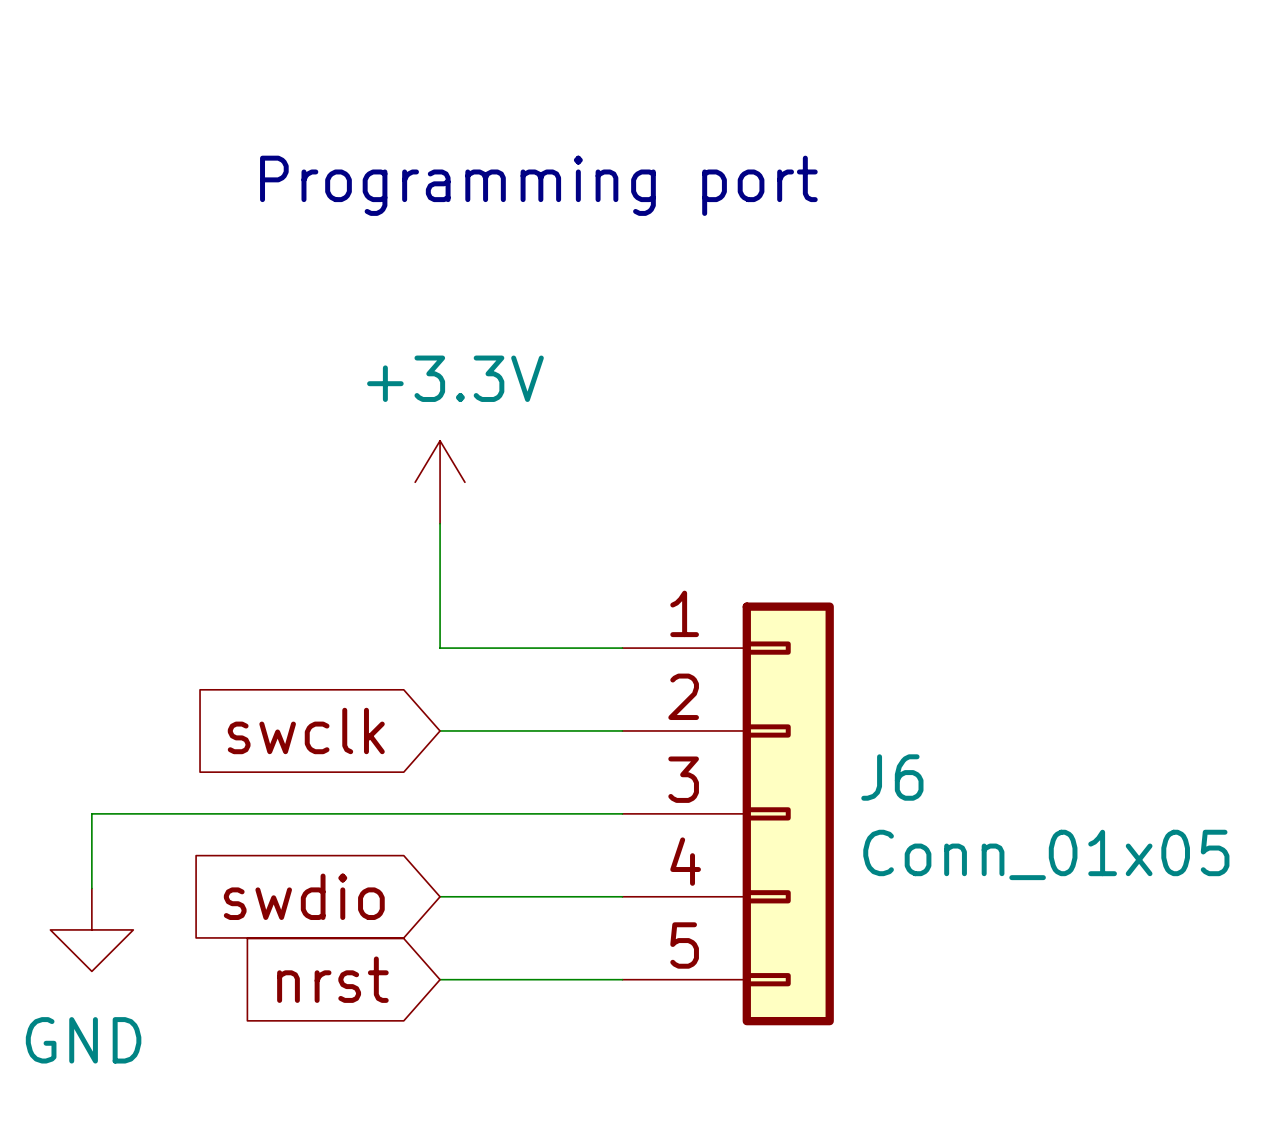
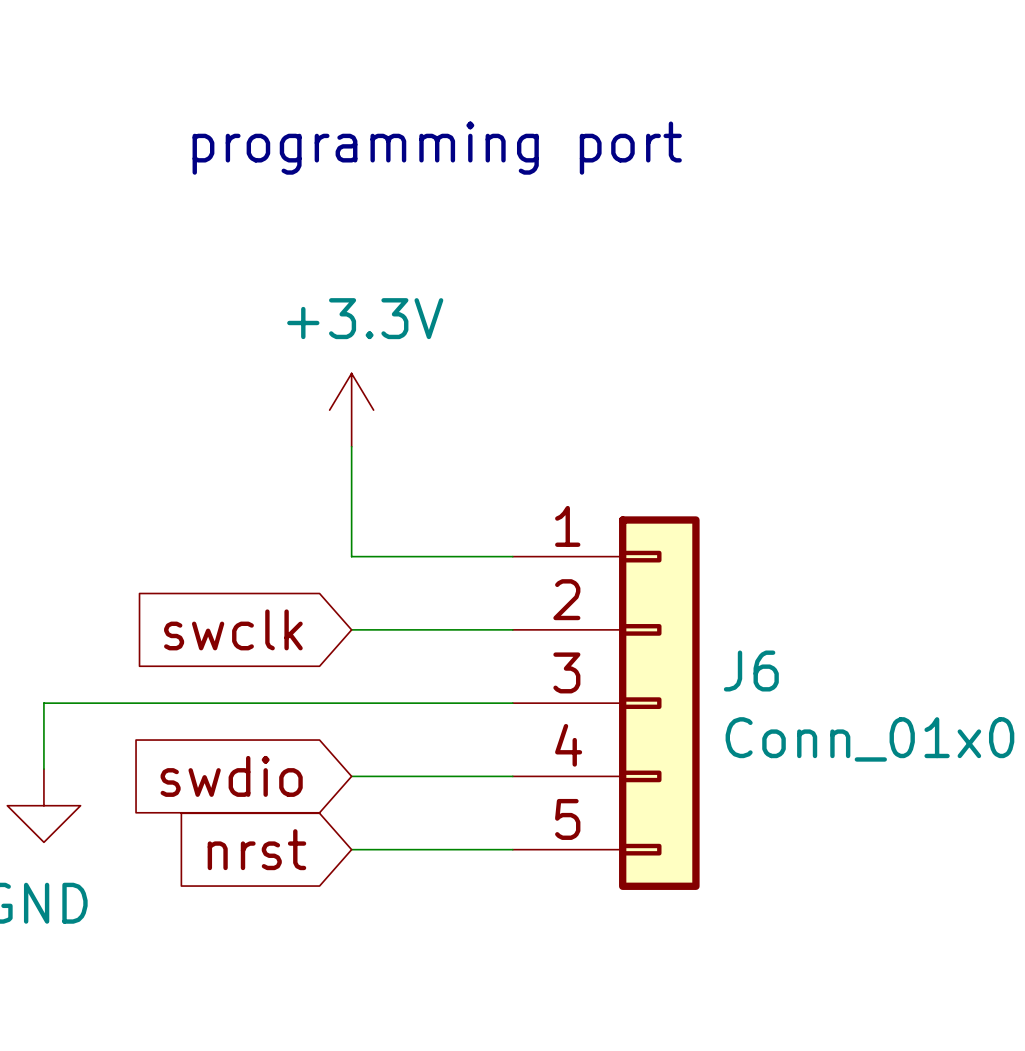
text: Programming port (538, 185) -> programming port (437, 148)

